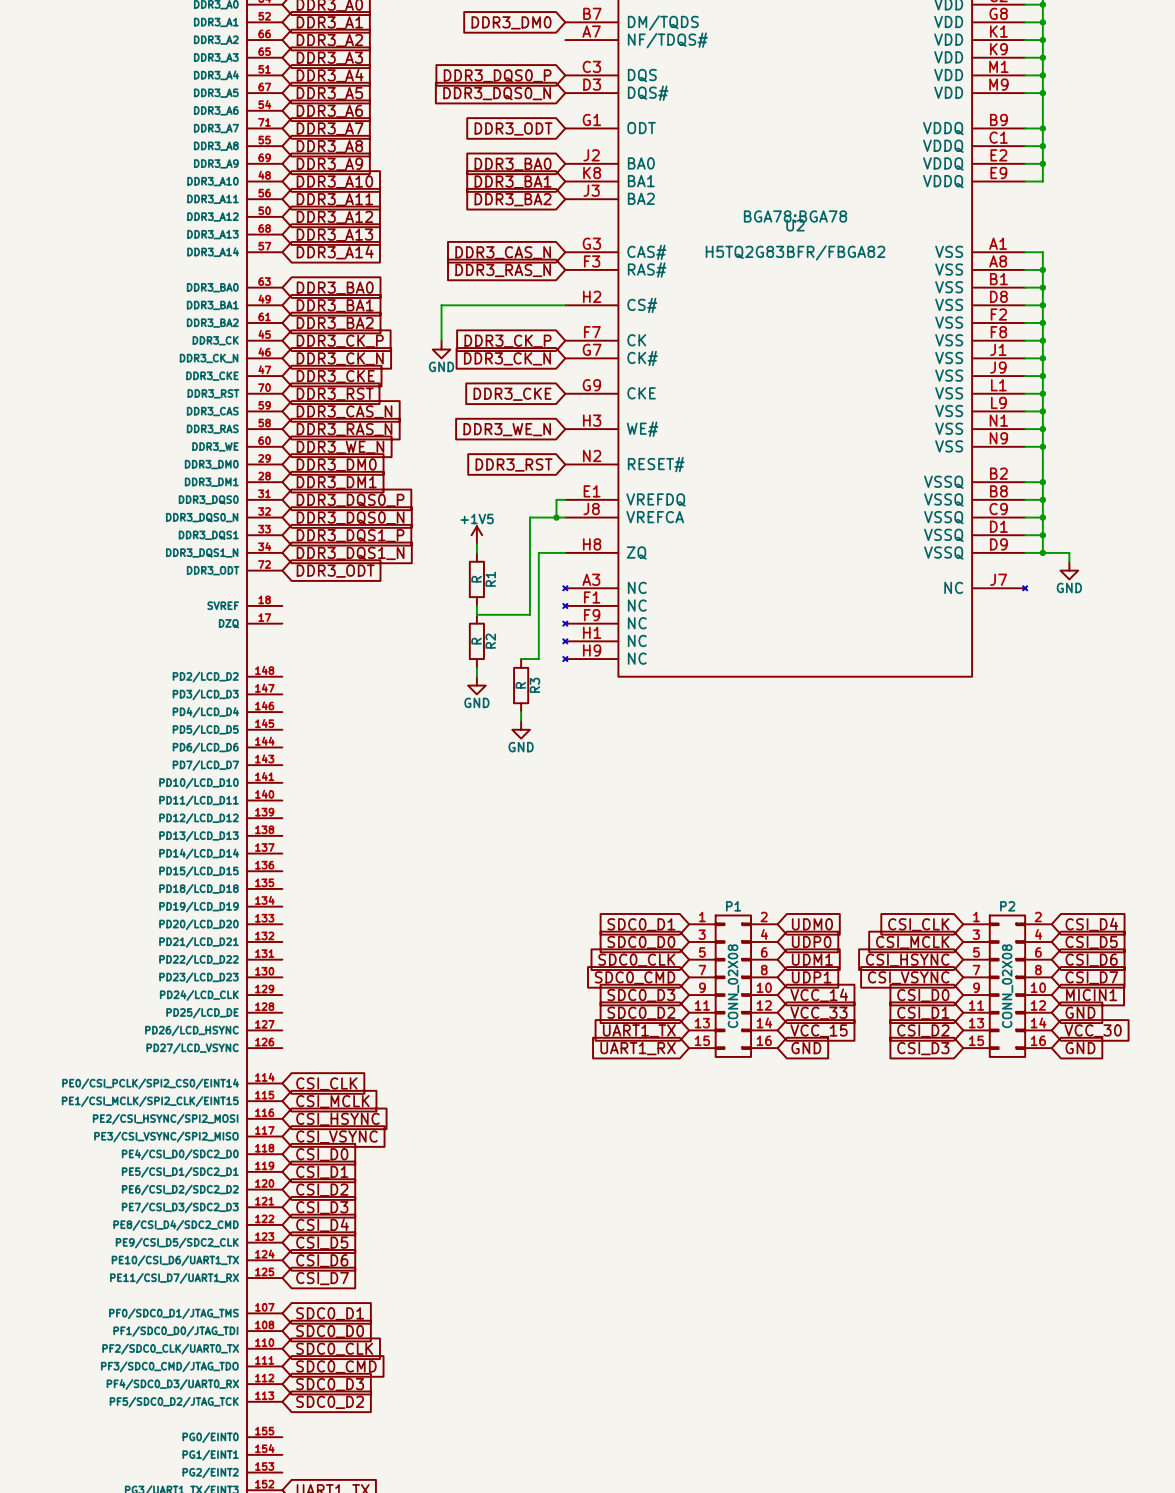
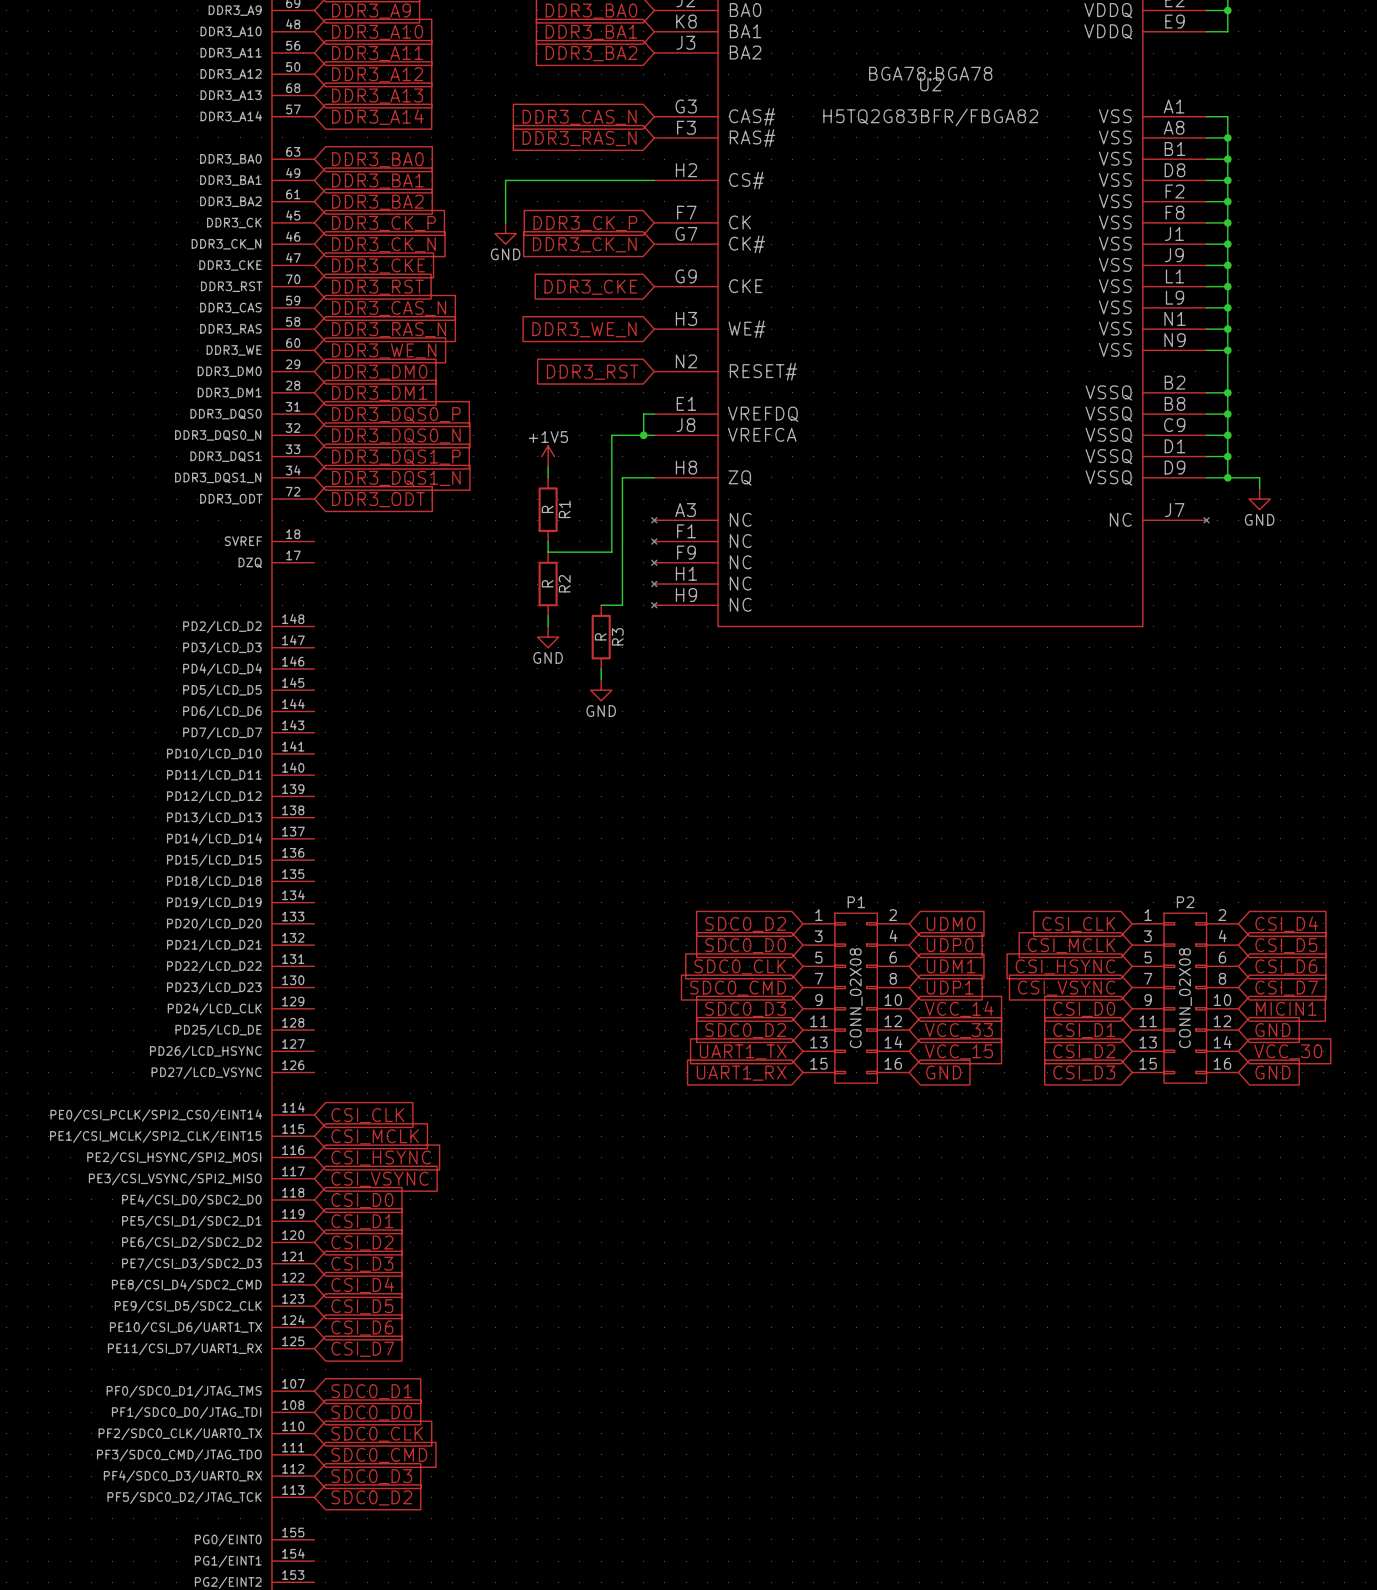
global label: SDC0_D1 (641, 924) -> SDC0_D2 (745, 924)

